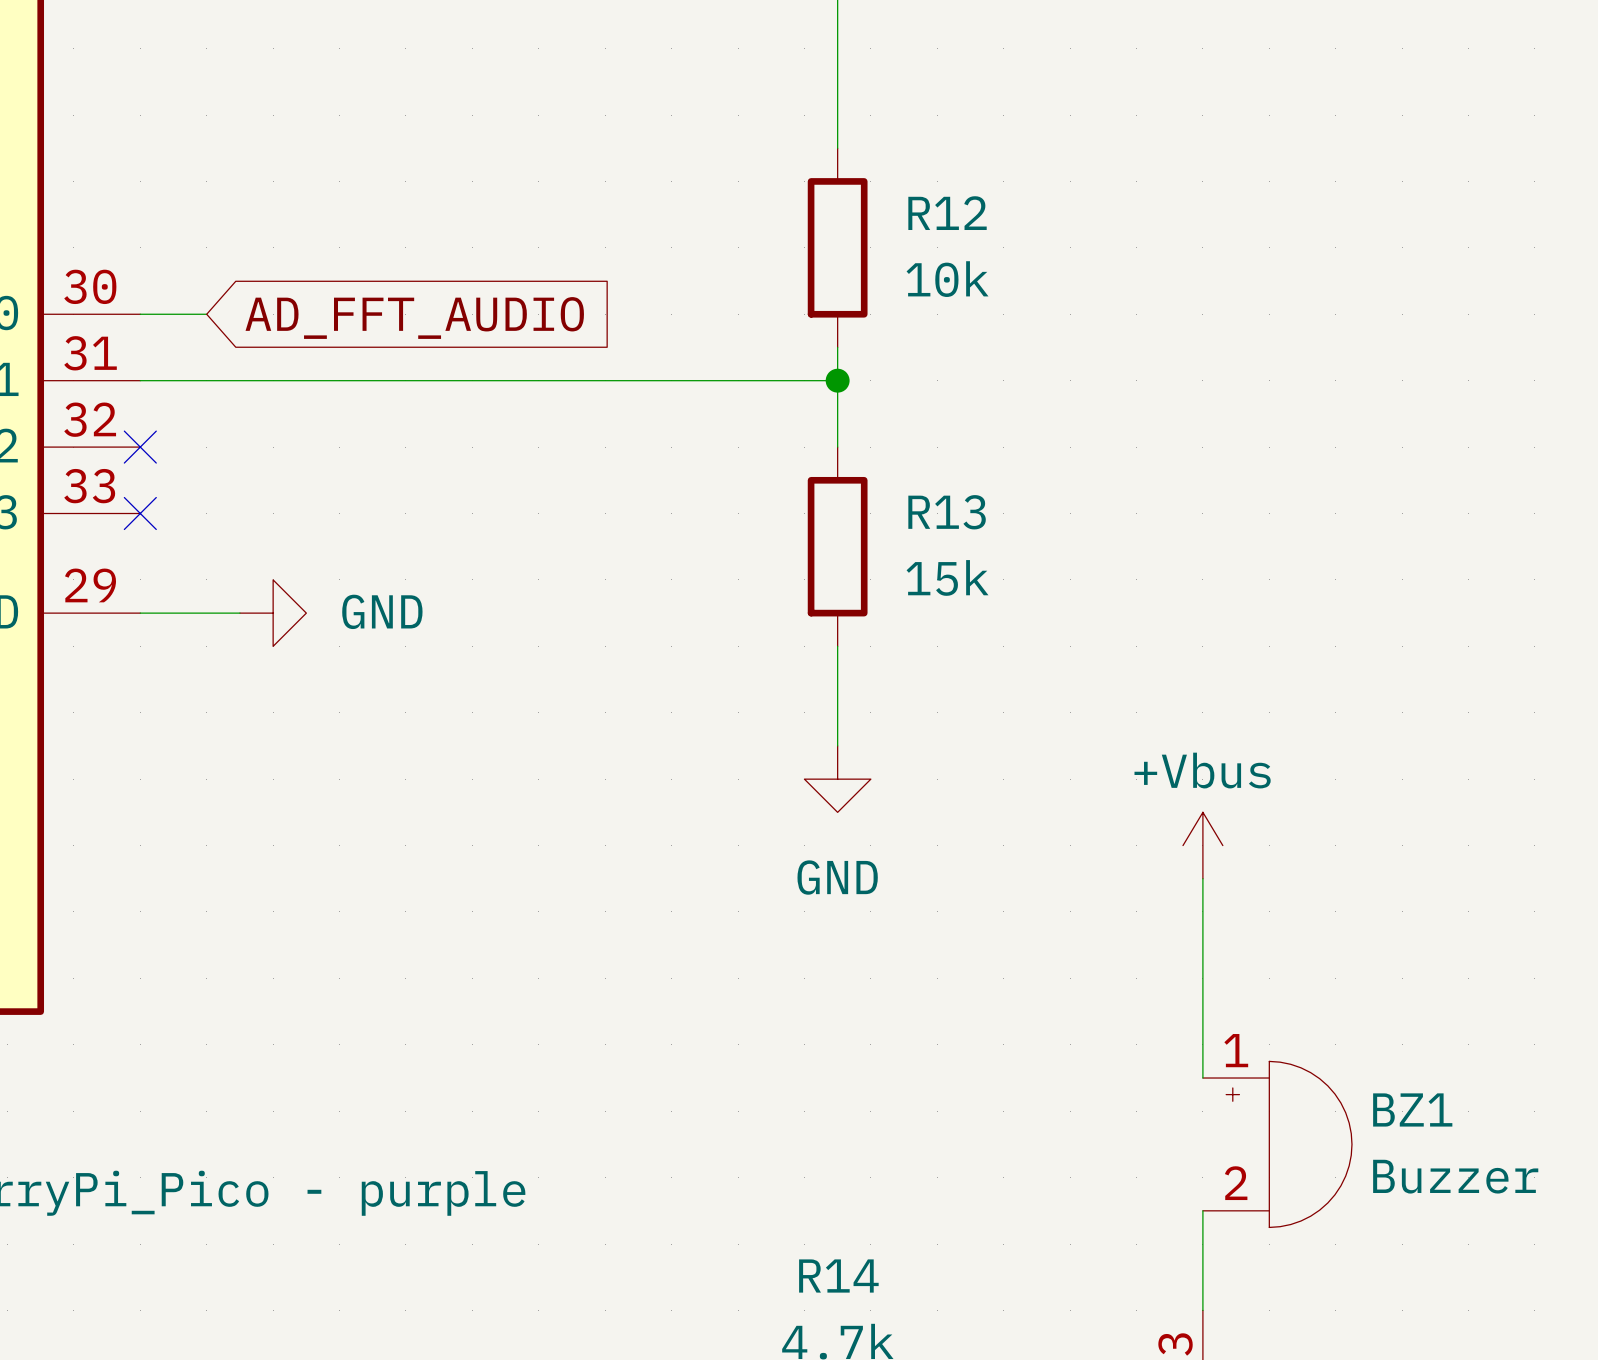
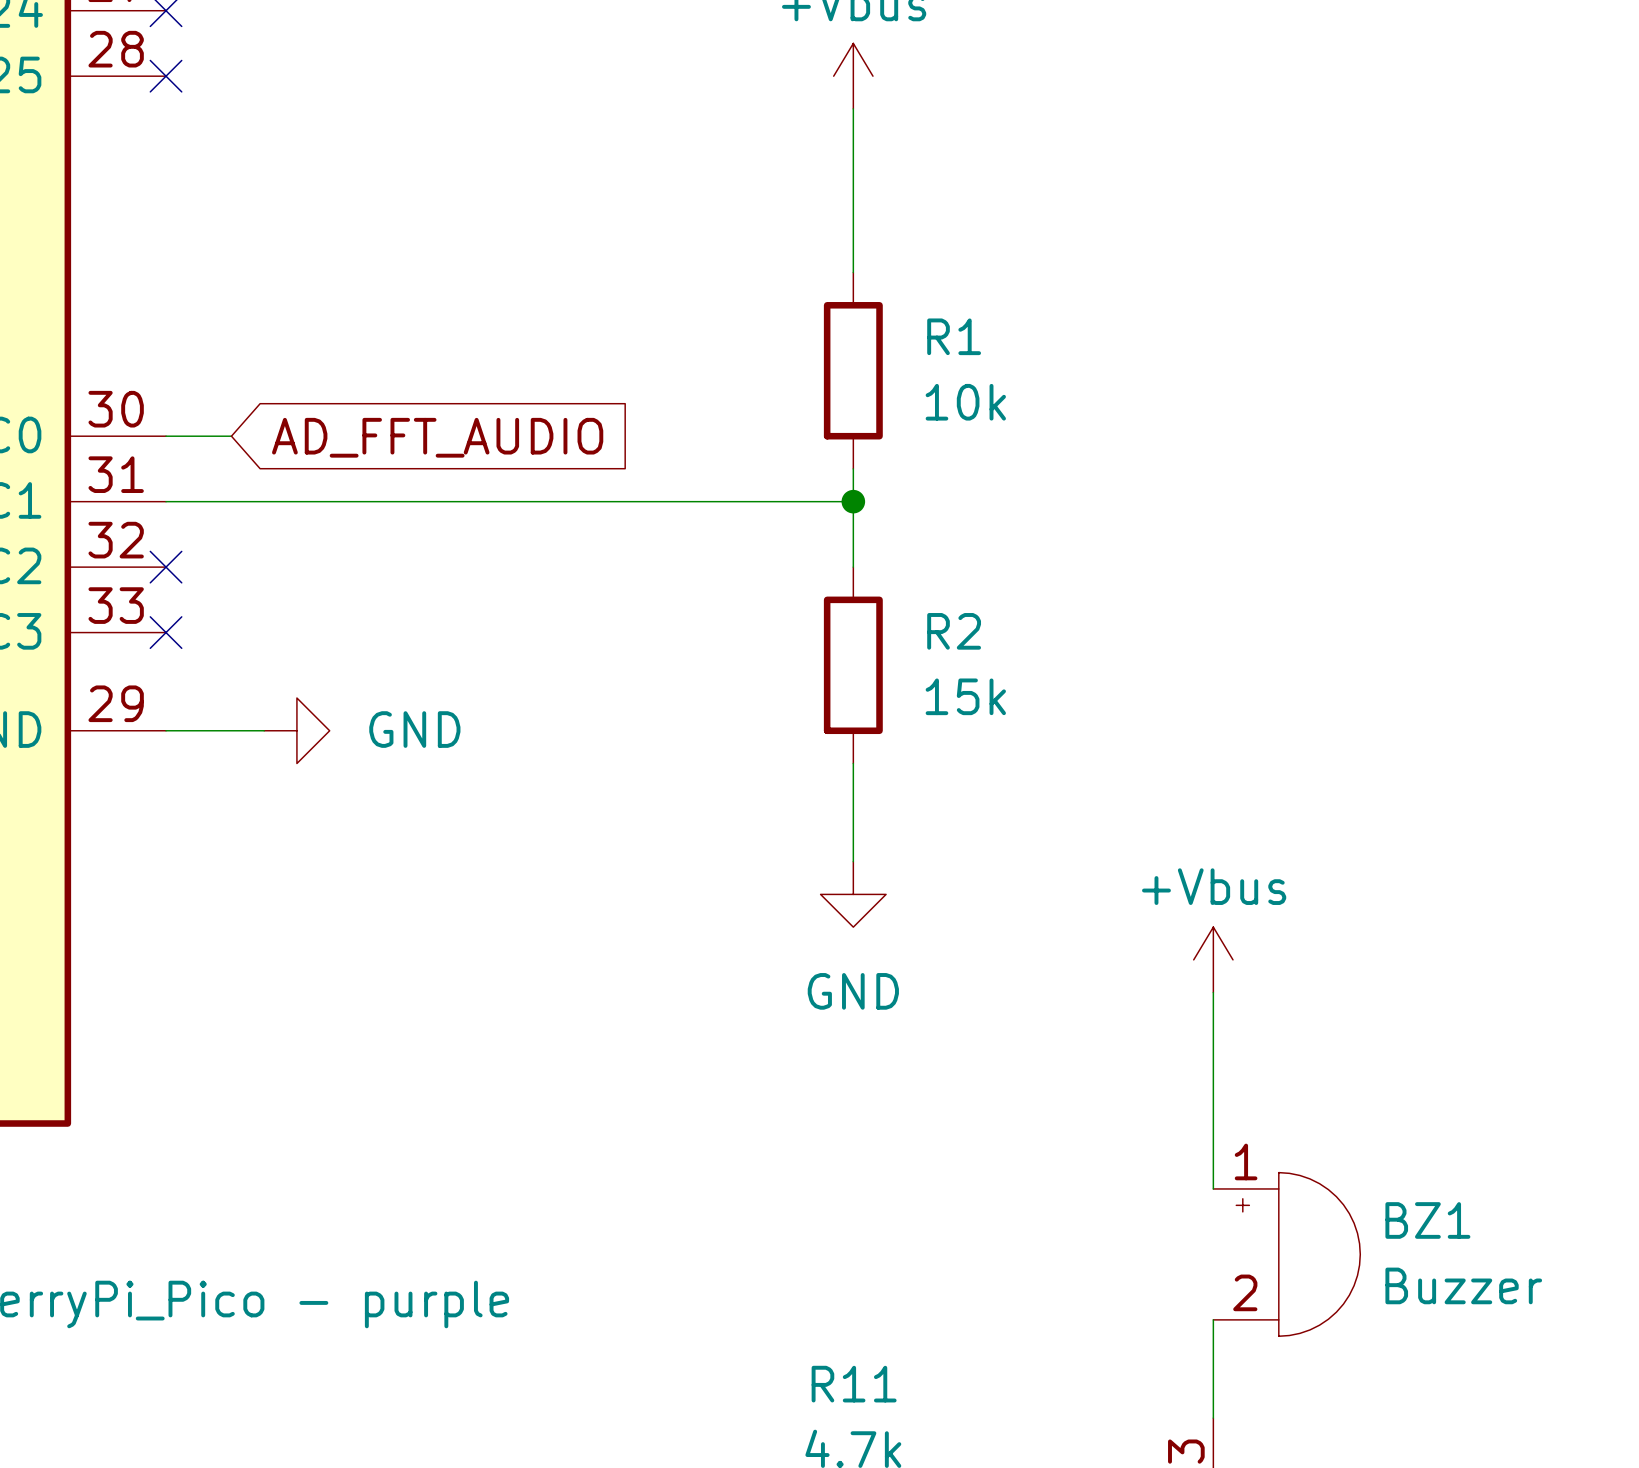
R12 name: R12 (947, 213) -> R1 (954, 336)
R13 name: R13 (947, 512) -> R2 (954, 631)
R14 name: R14 (838, 1276) -> R11 (854, 1384)

